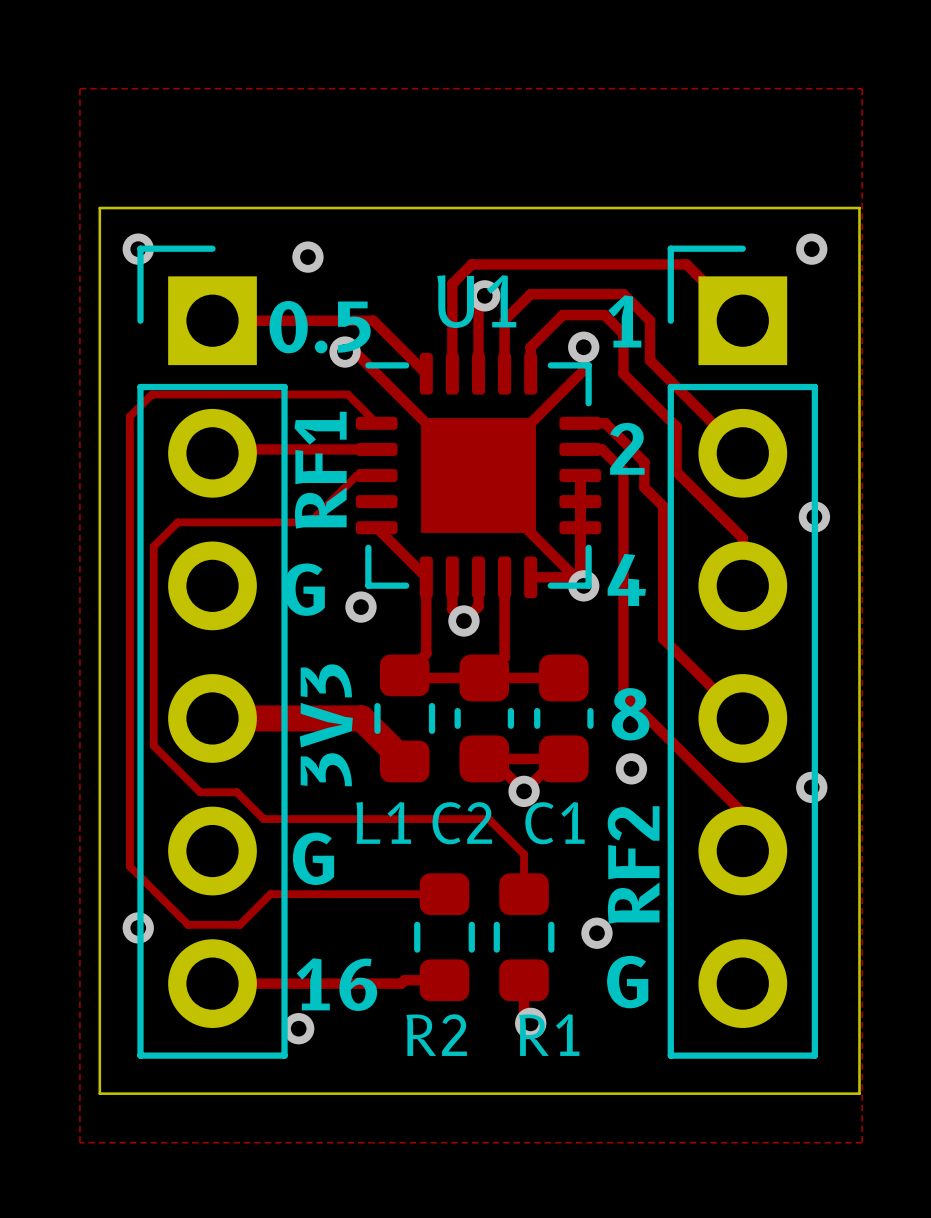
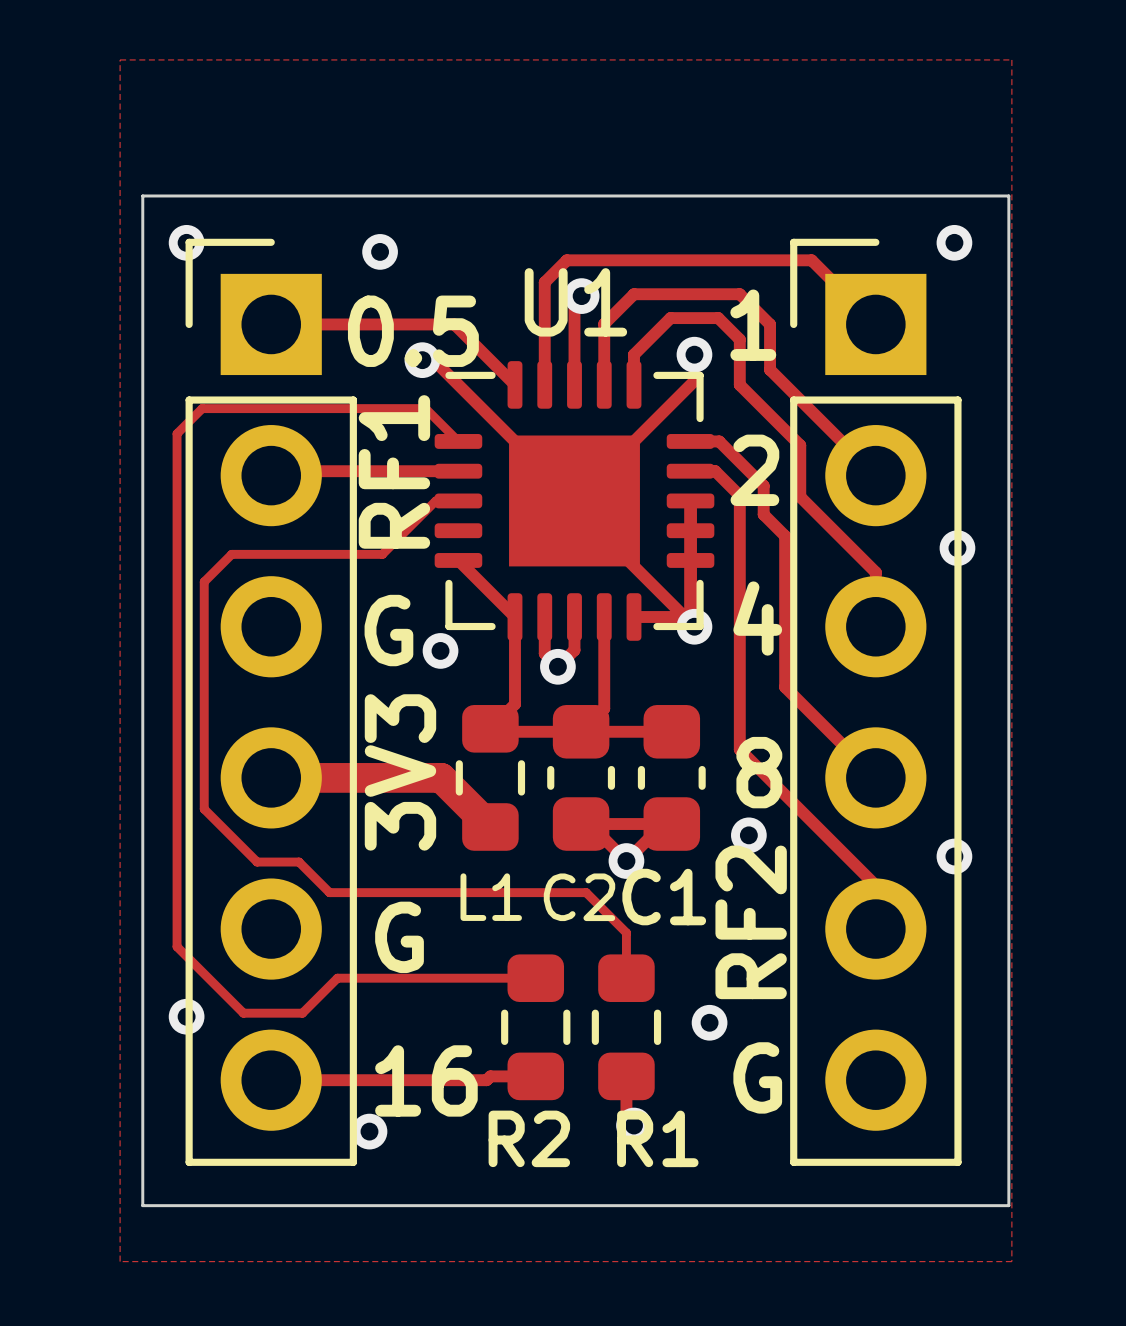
L1 name position: L1 (383, 822) -> L1 (491, 897)
C2 name position: C2 (462, 823) -> C2 (579, 897)

